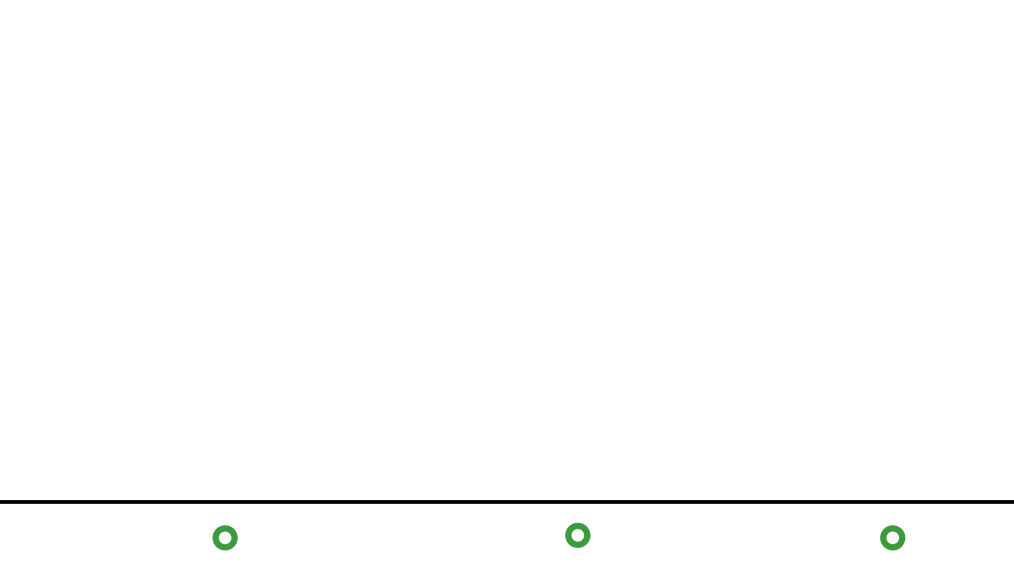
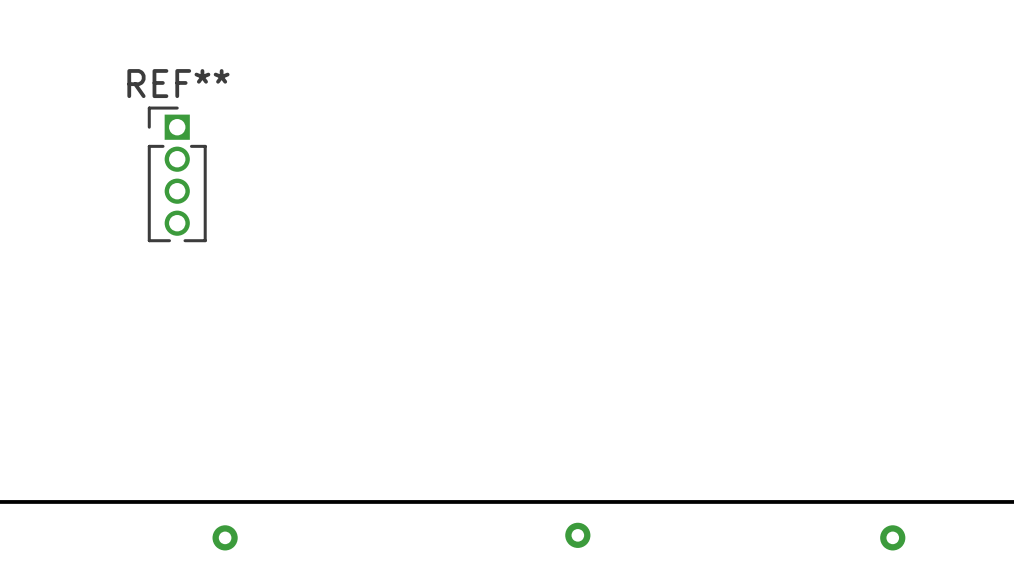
REF**: none -> (177, 174)

